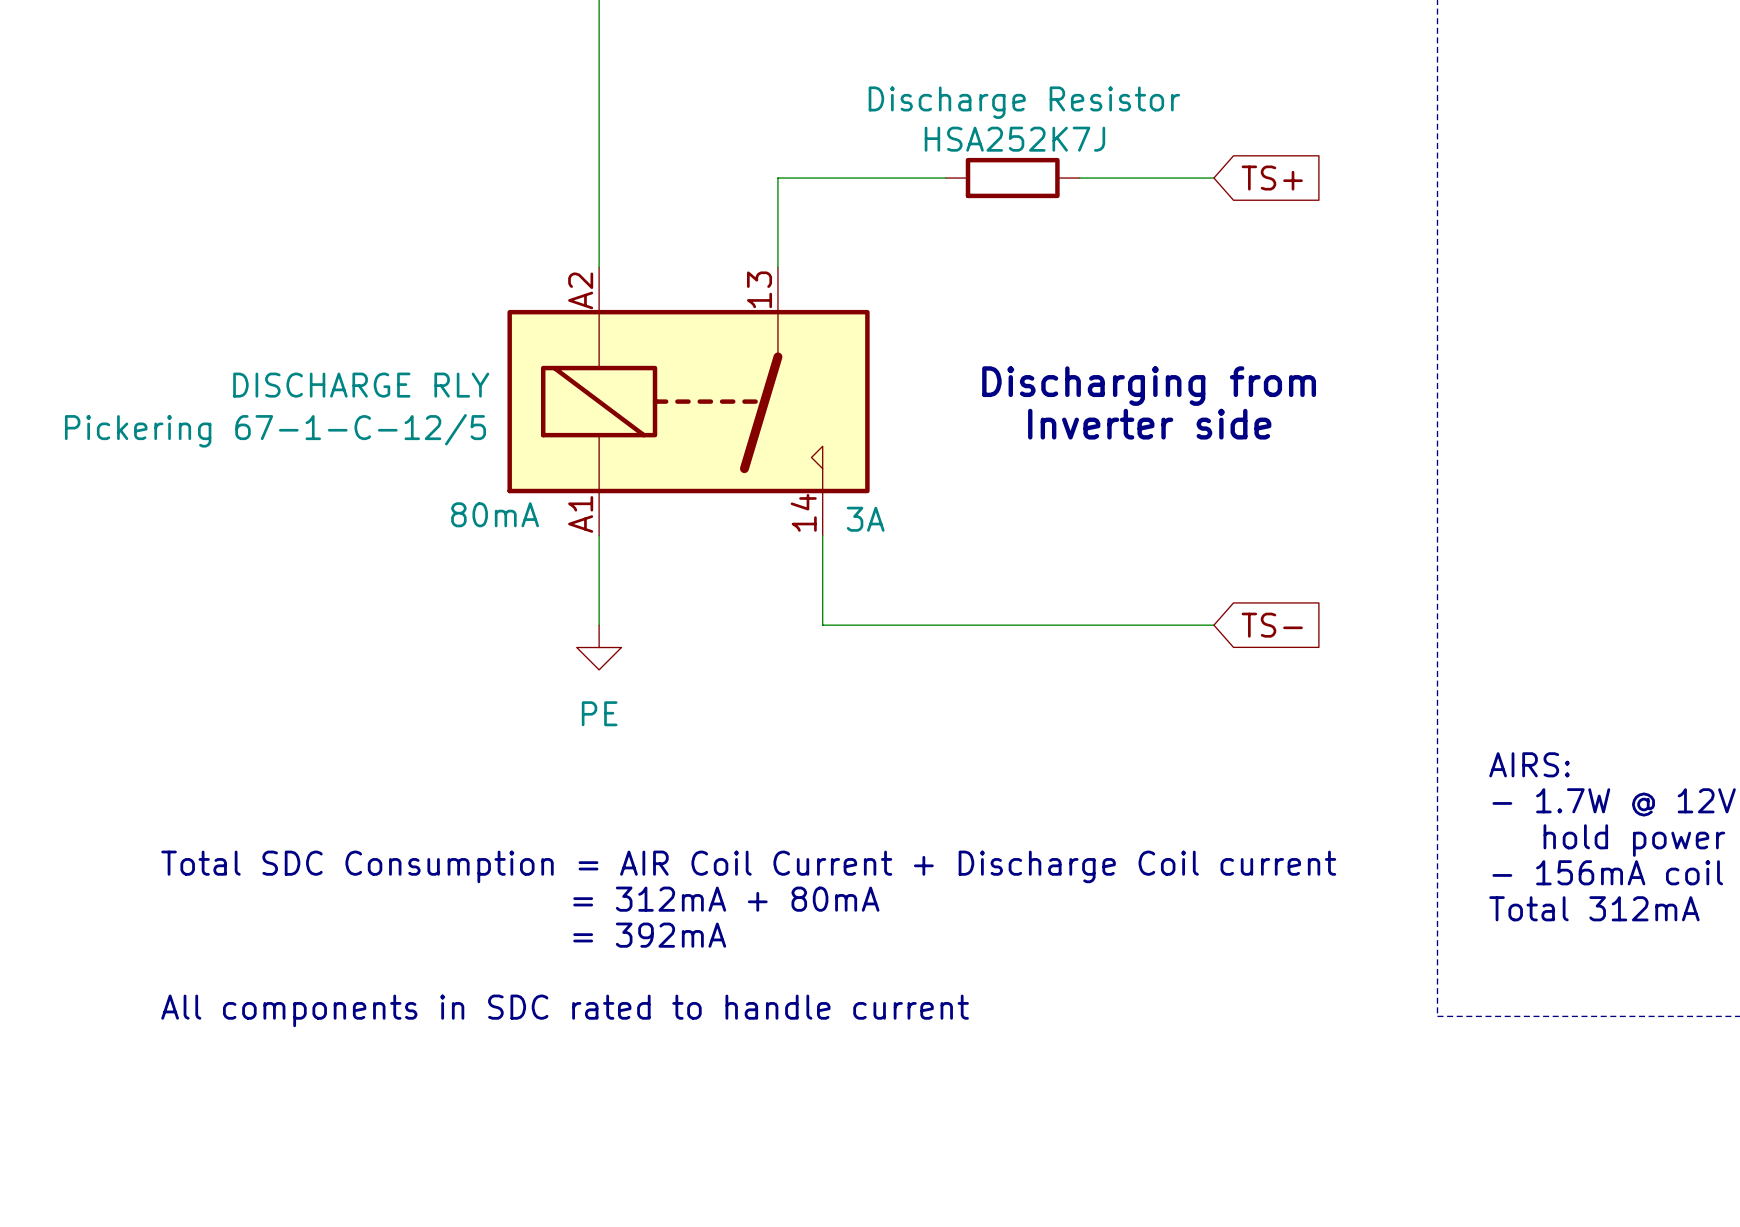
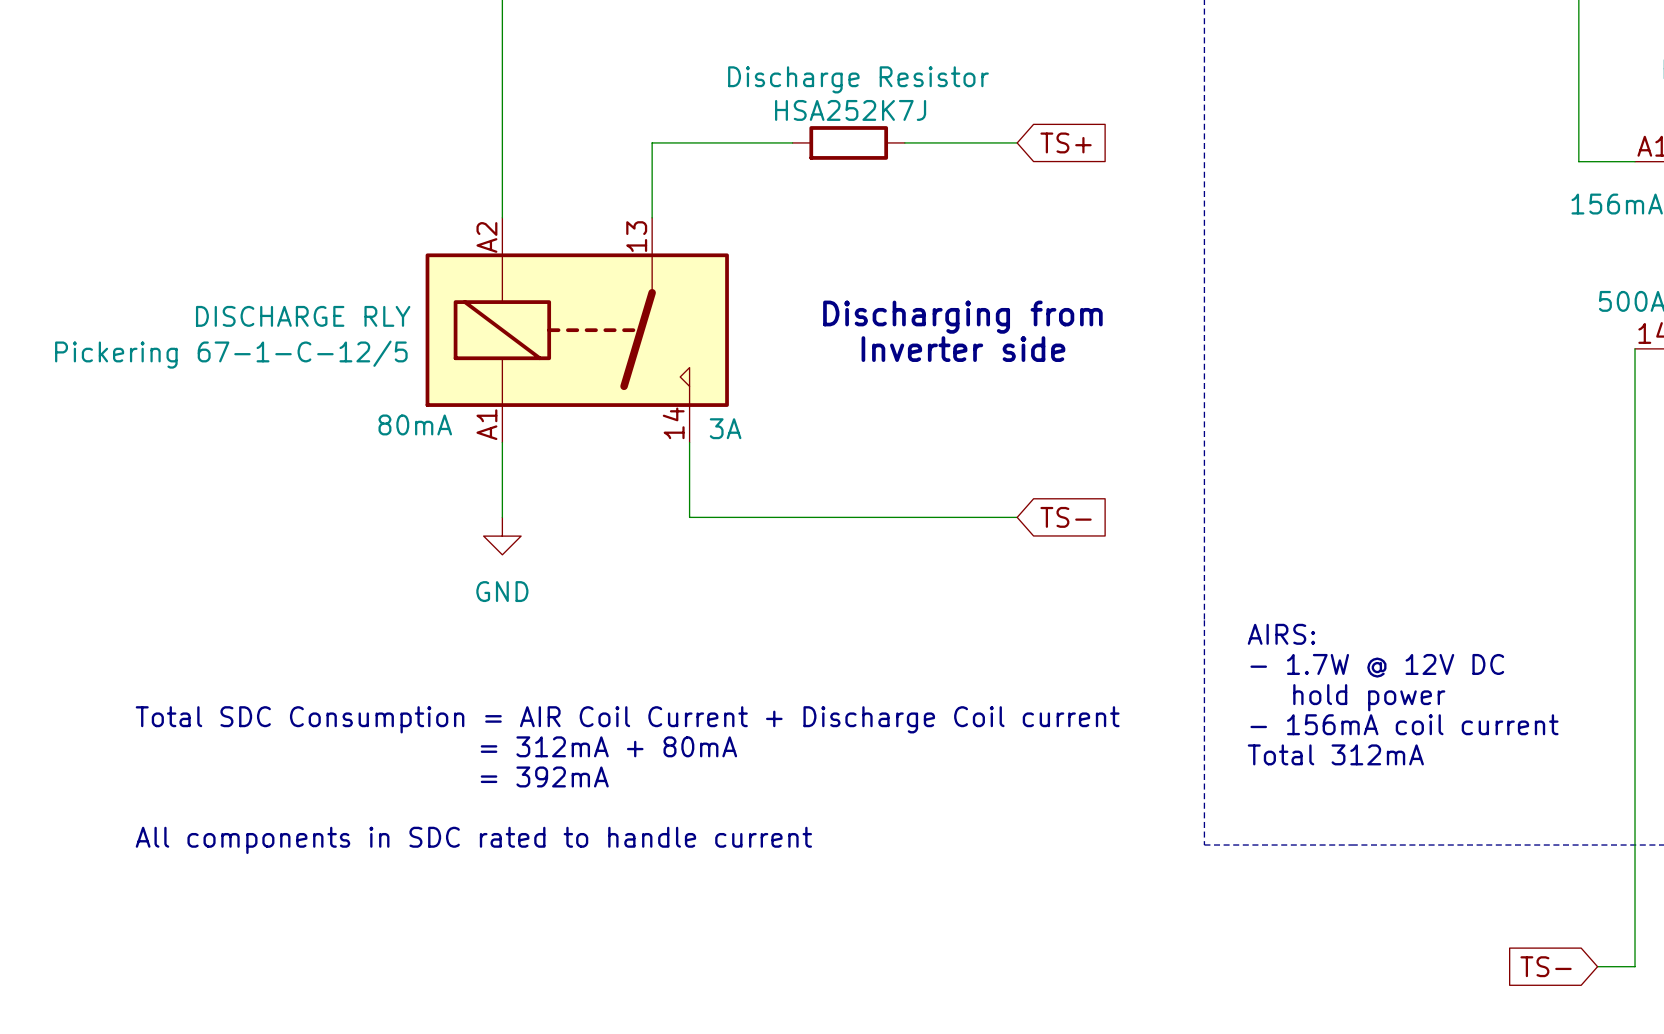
power symbol: PE (599, 647) -> GND (502, 536)

